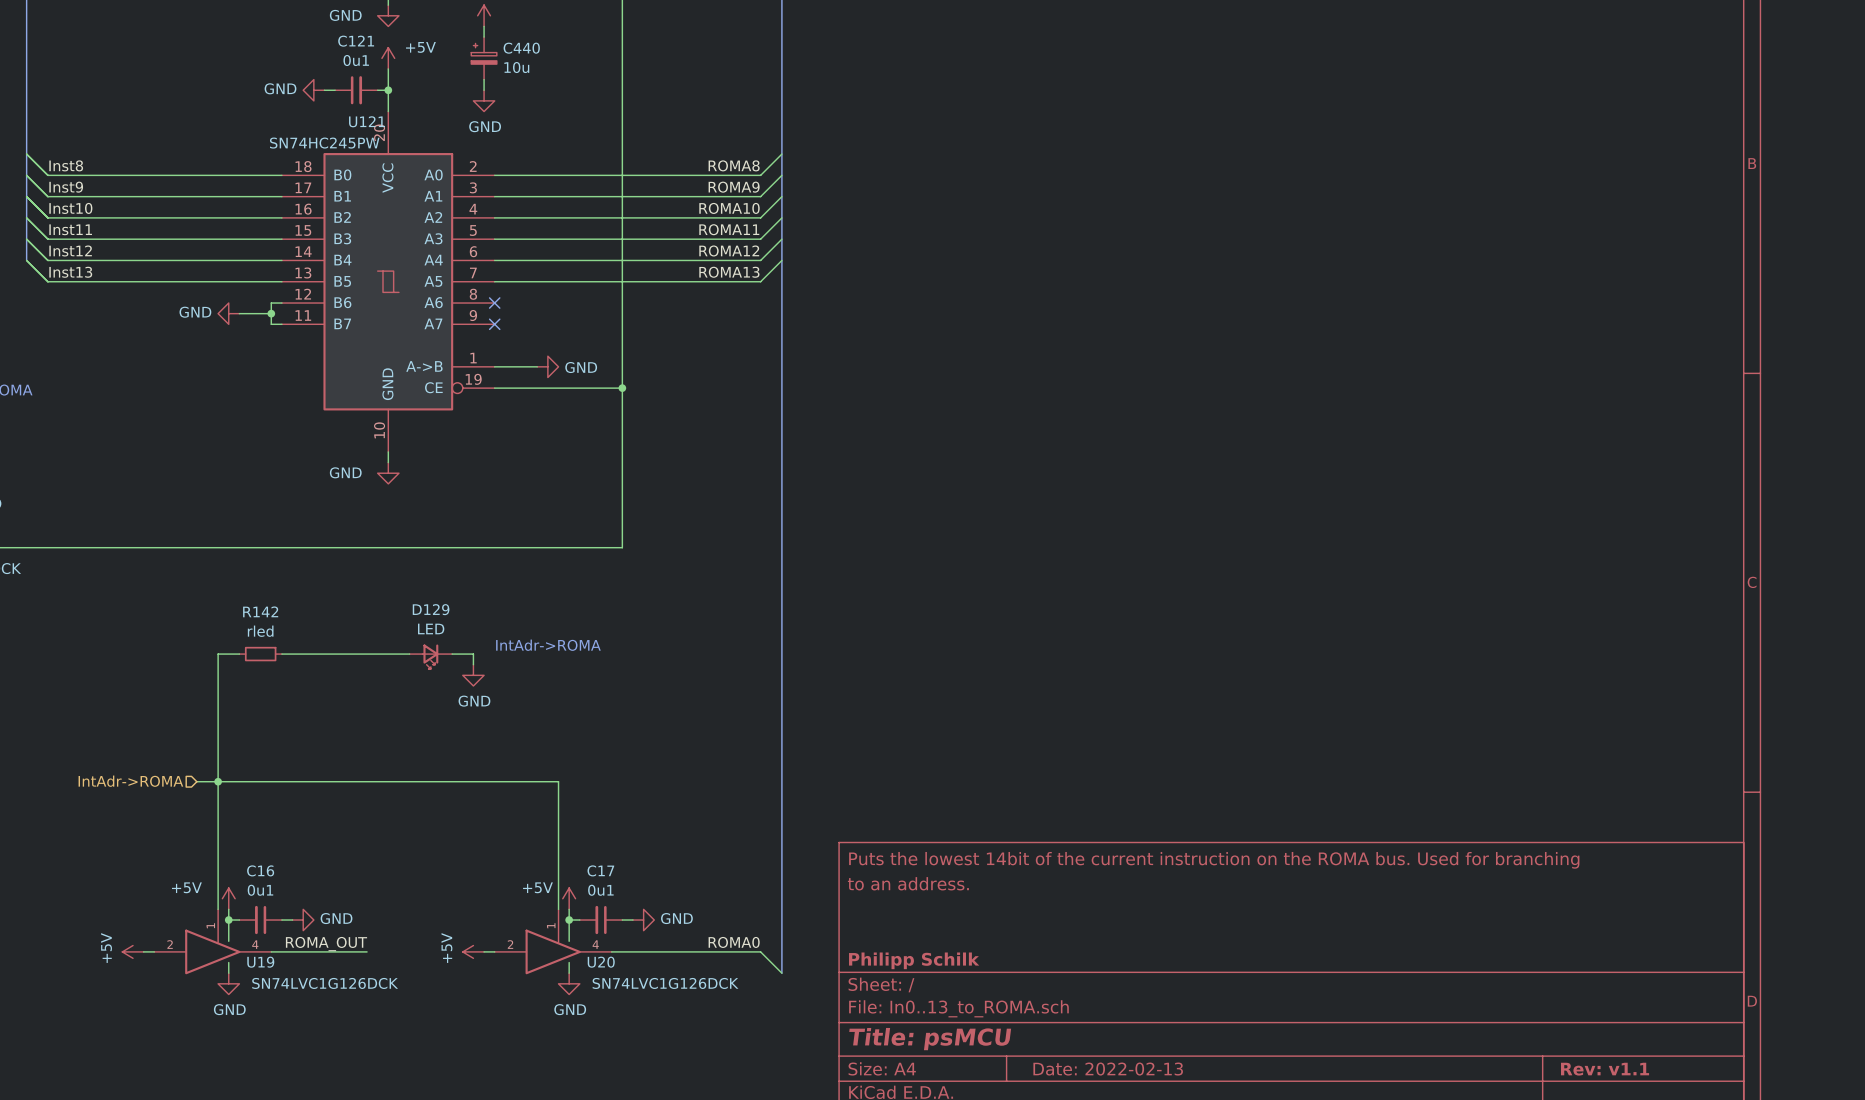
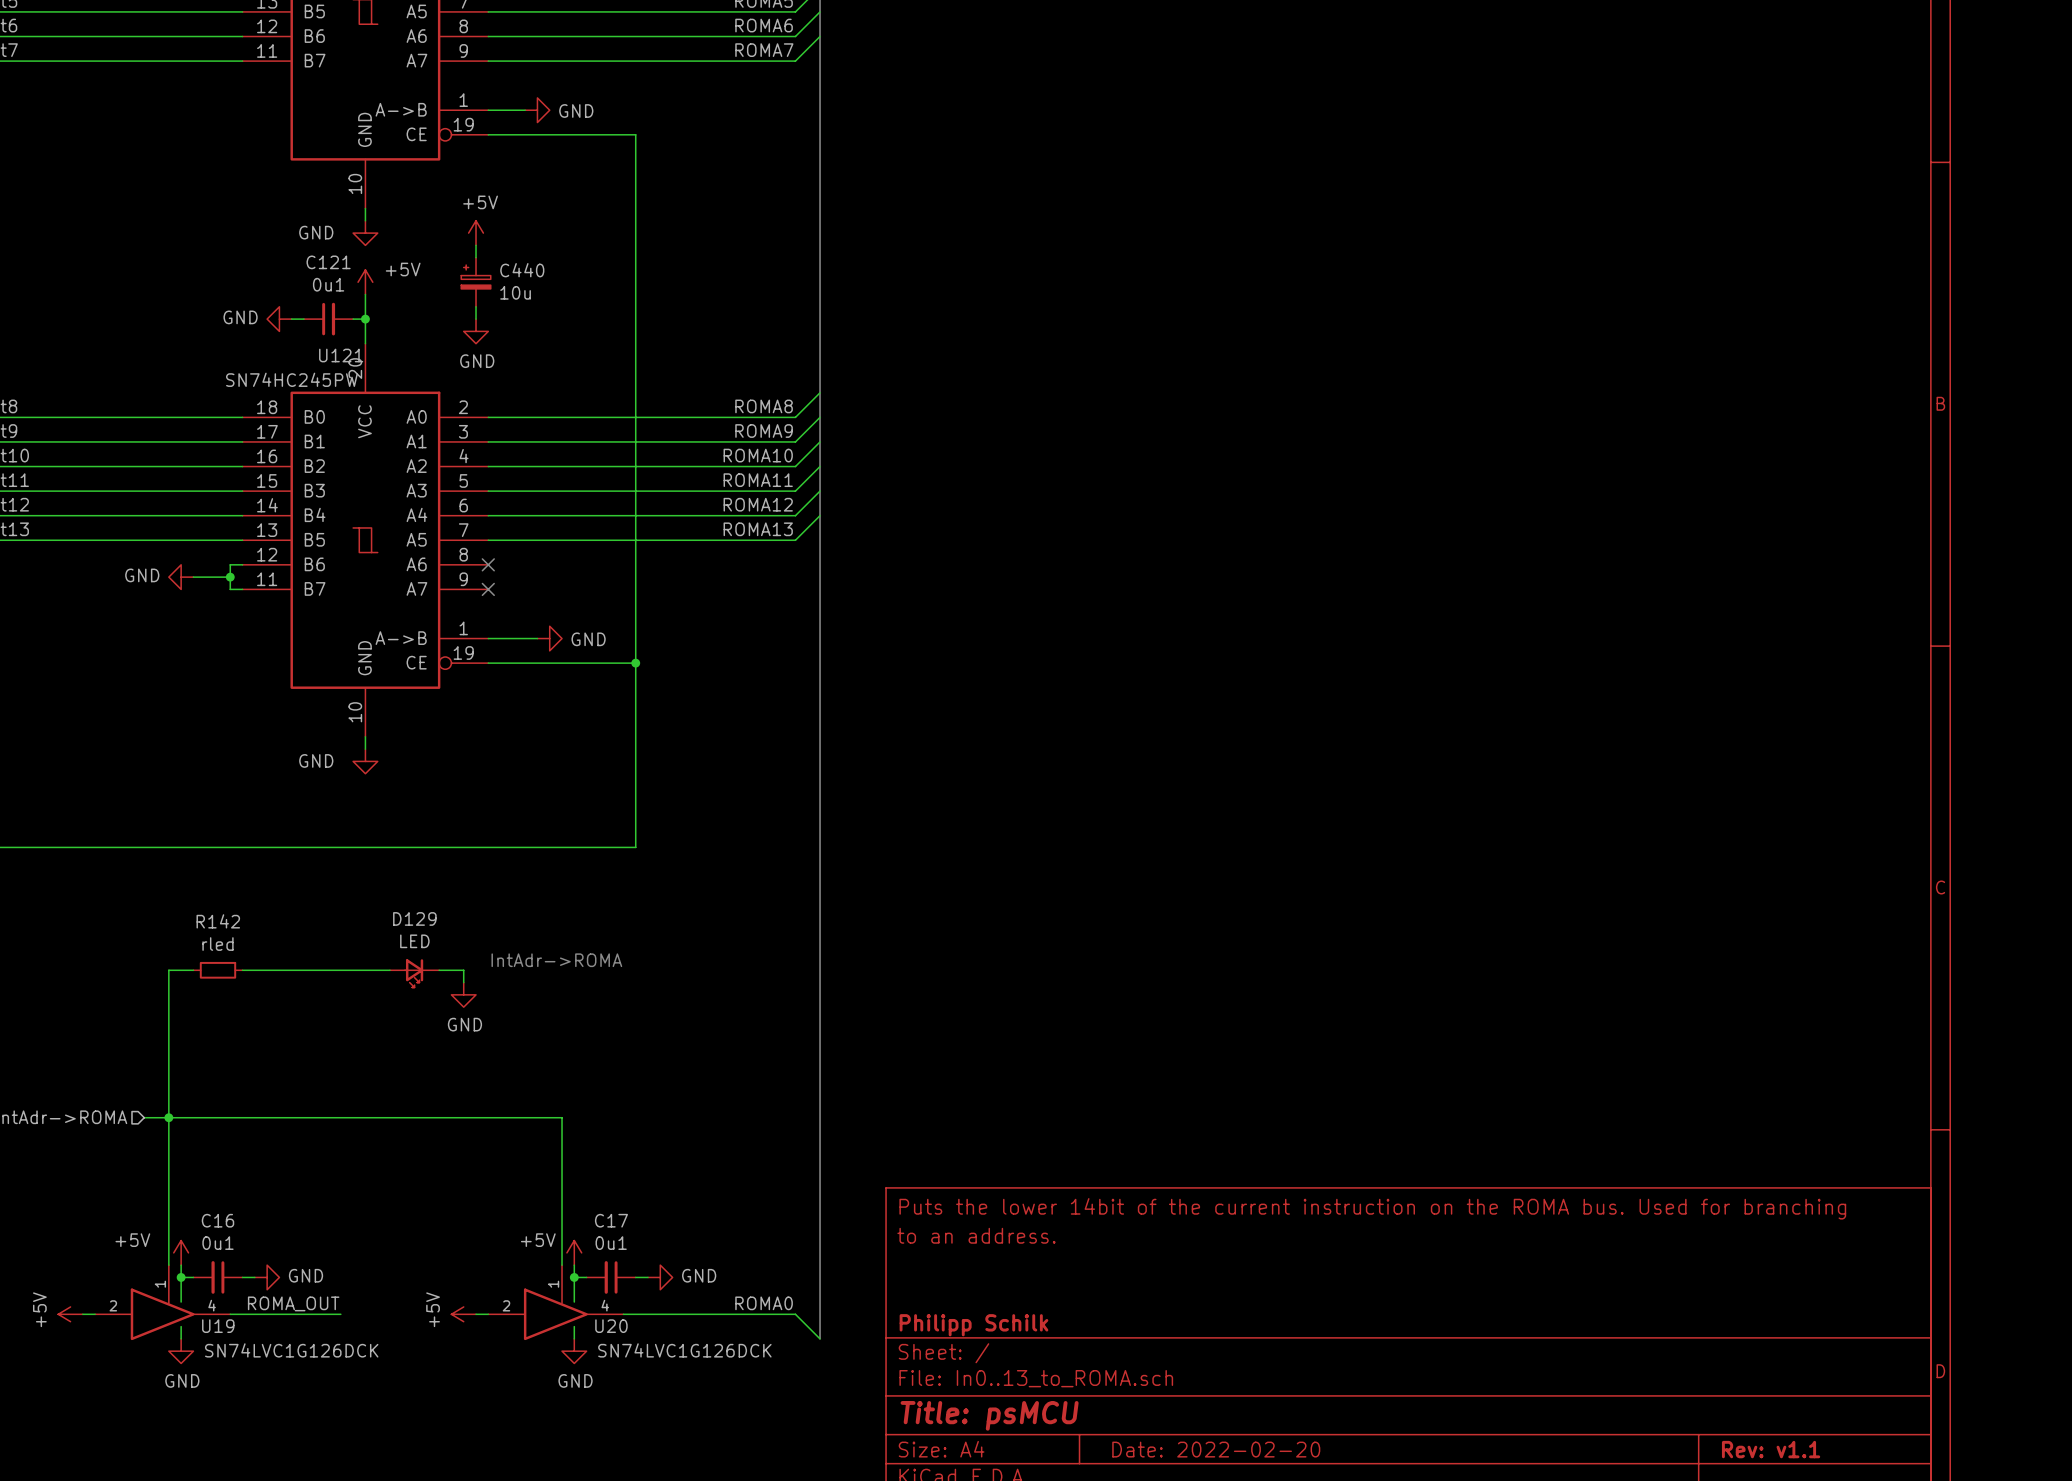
title block: Puts the lowest 14bit of the current instruction on the ROMA bus. Used for branching (1214, 860) -> Puts the lower 14bit of the current instruction on the ROMA bus. Used for branching (1372, 1208)
title block: Date: 2022-02-13 (1108, 1069) -> Date: 2022-02-20 (1216, 1449)

